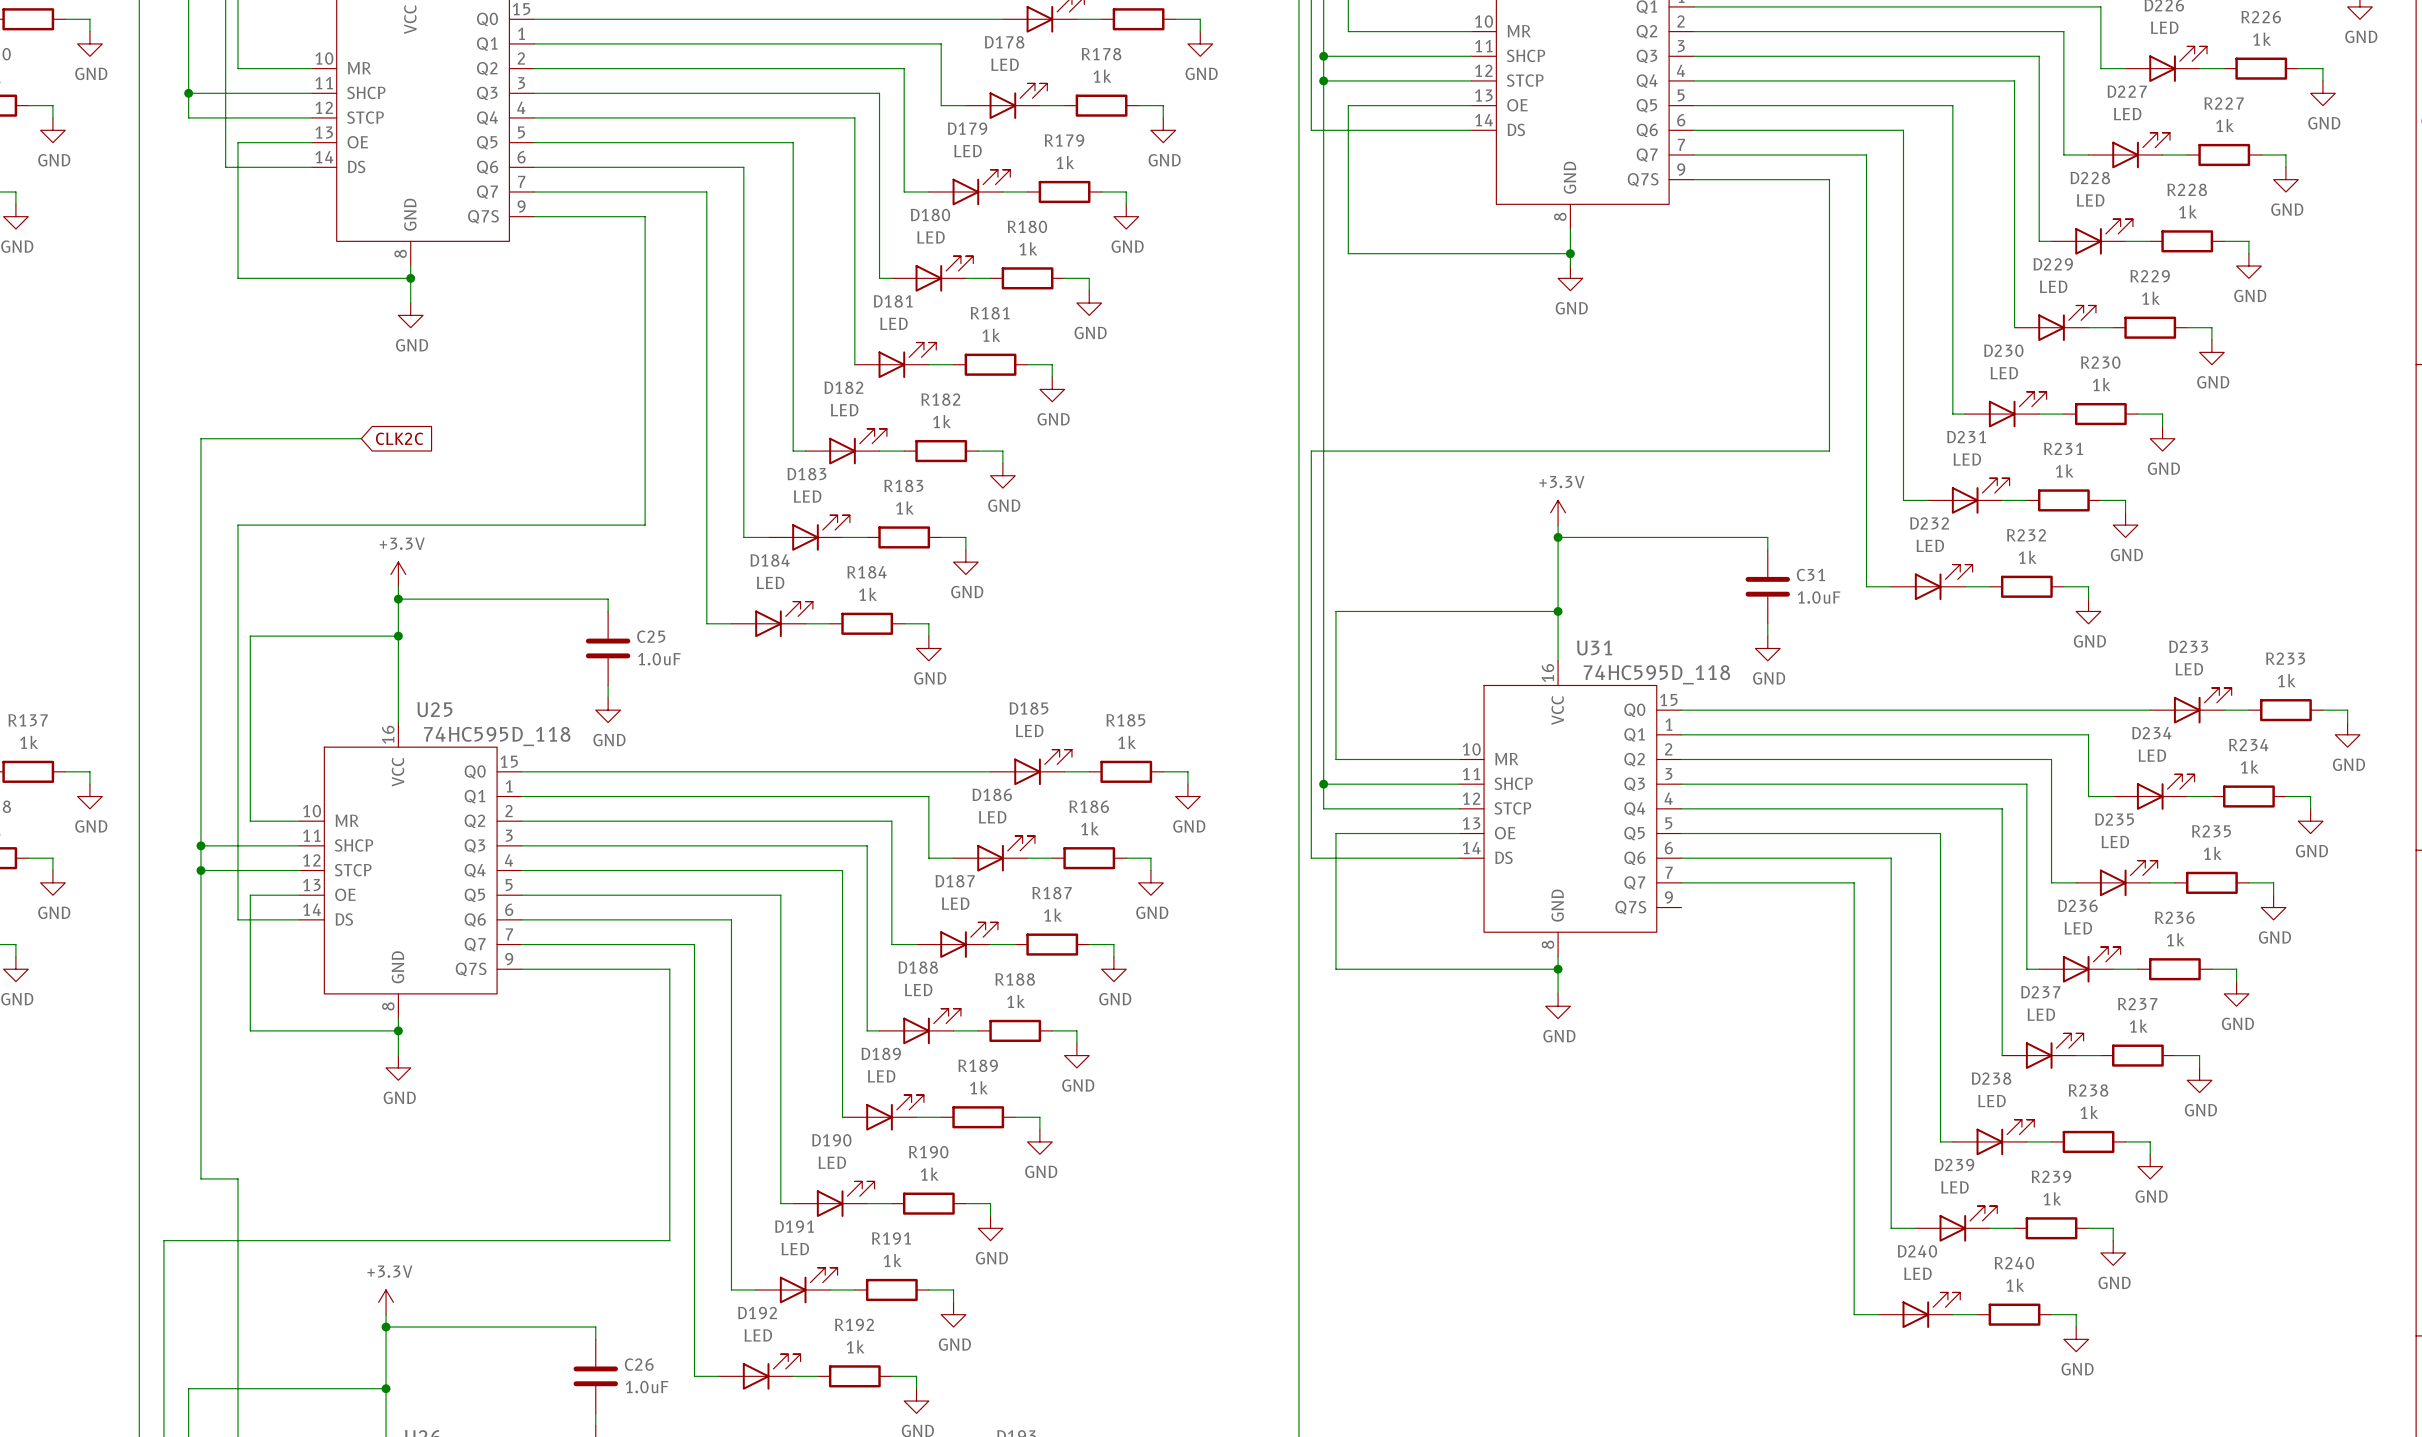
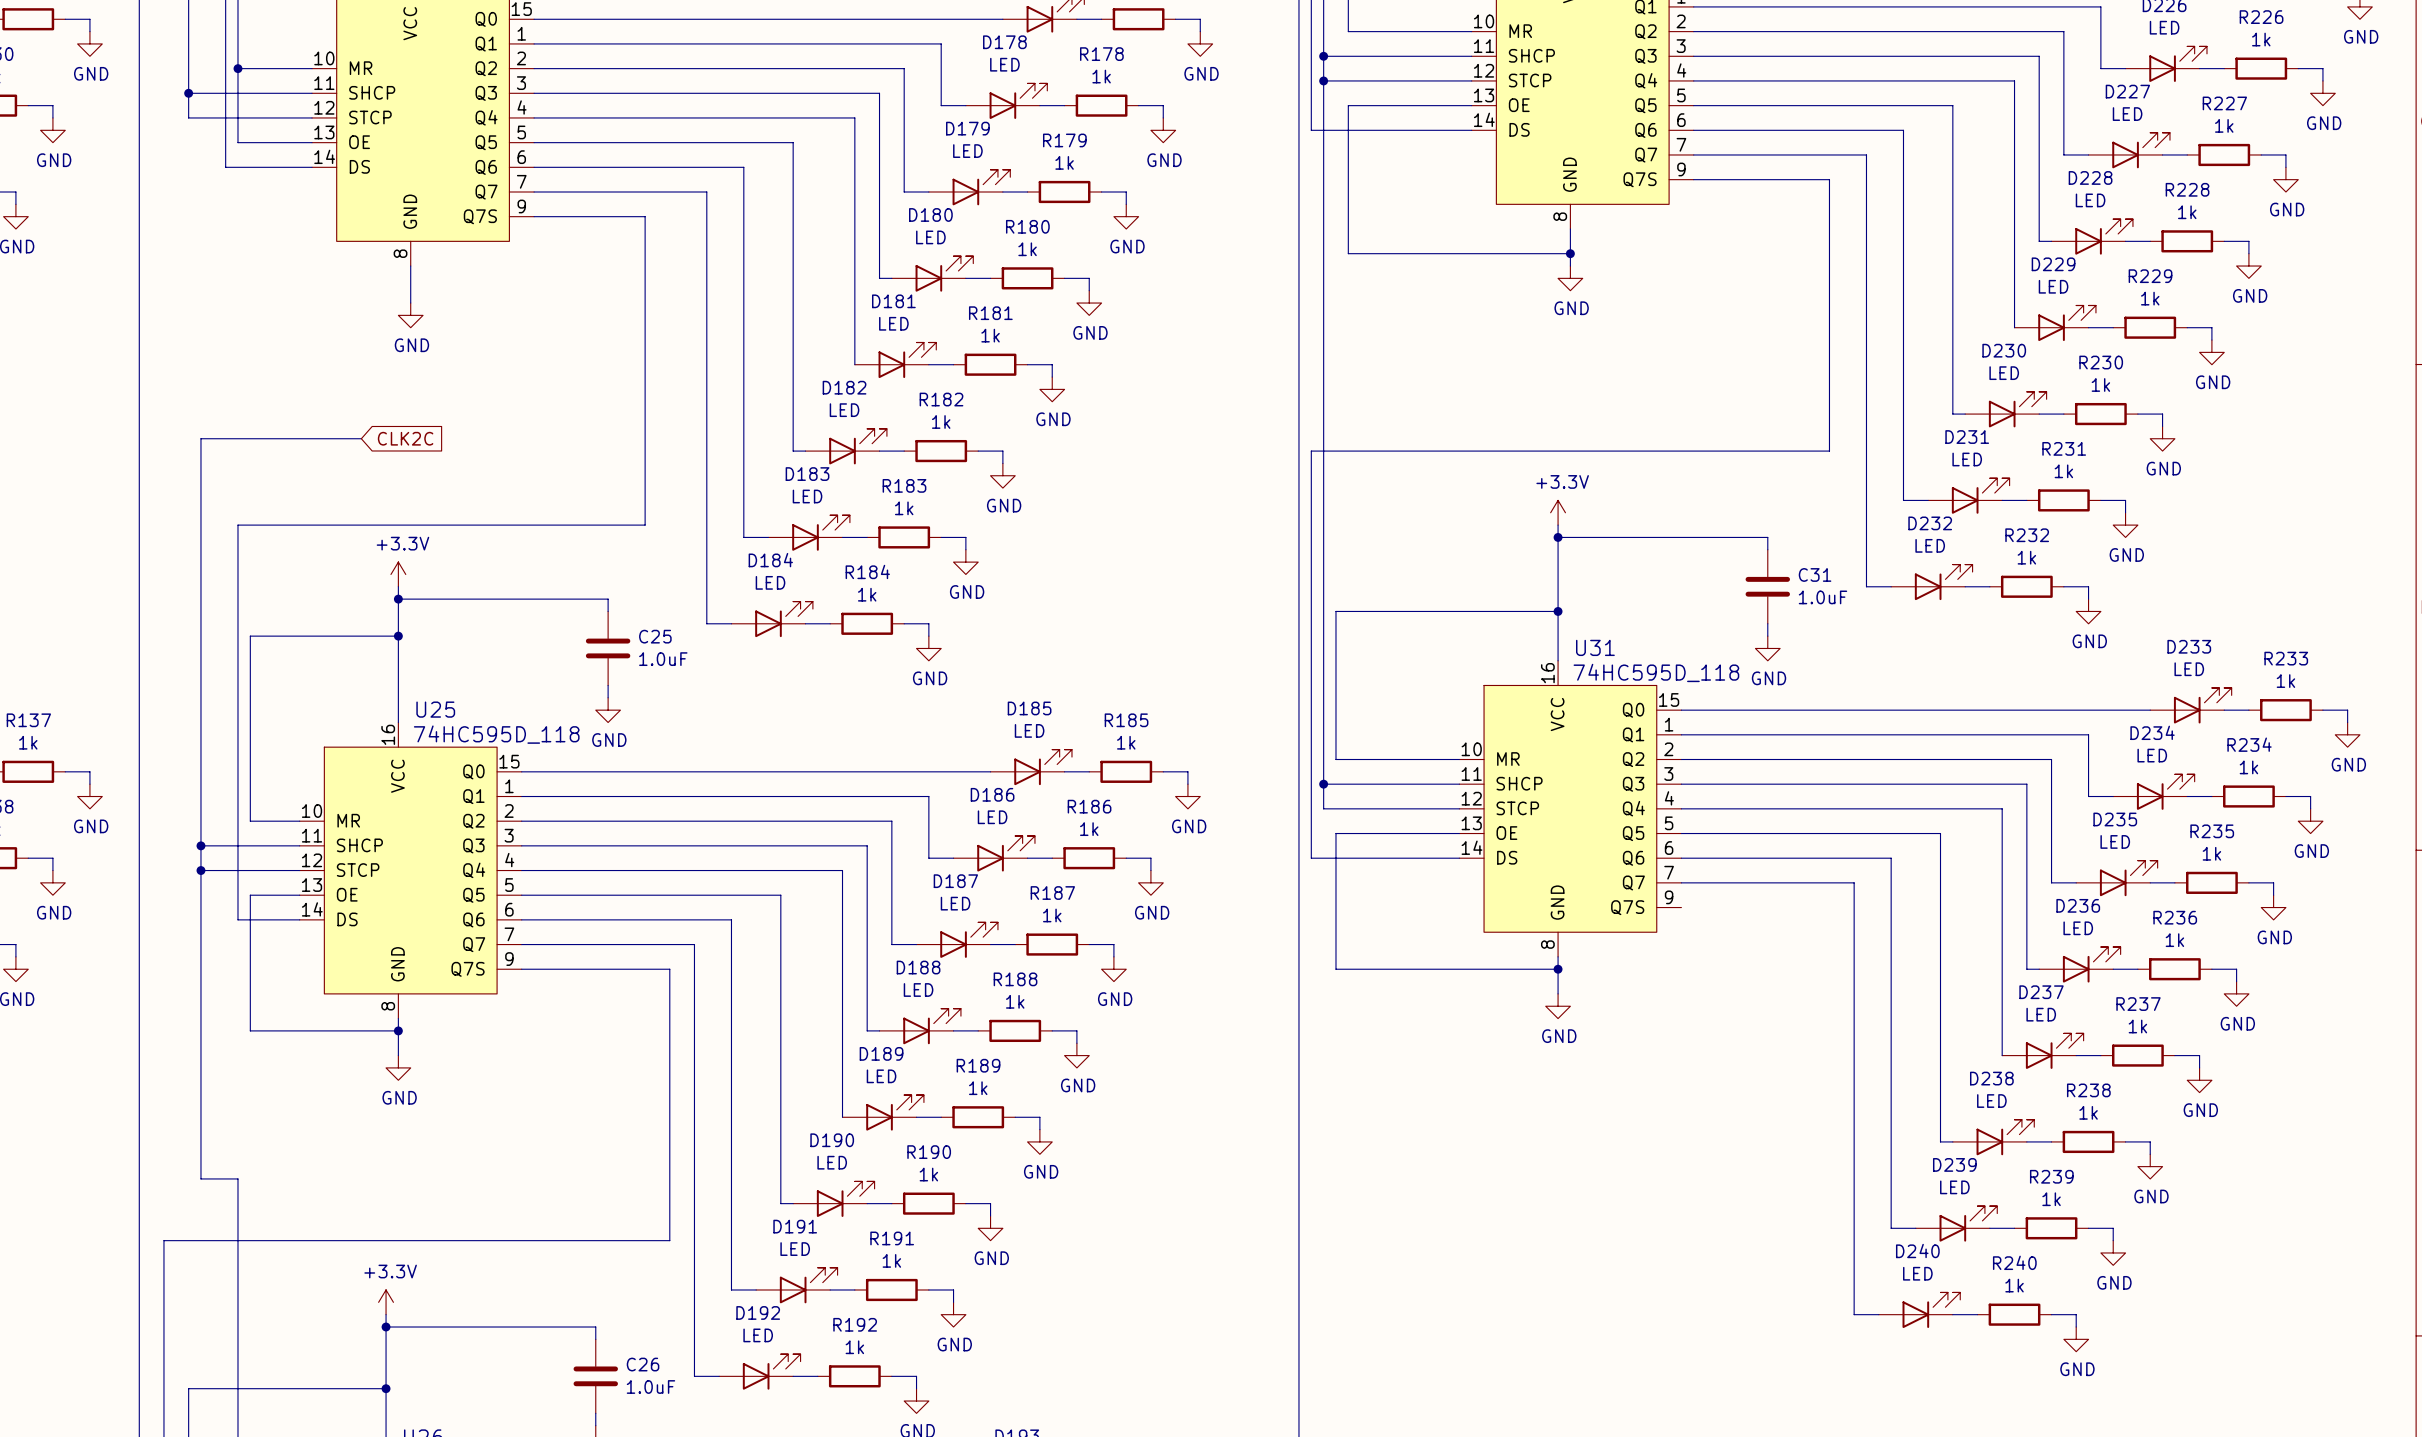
junction: none -> (237, 68)
wire: (237, 142) (237, 278) (410, 278) -> (237, 142) (237, 68)
junction: (410, 278) -> none

